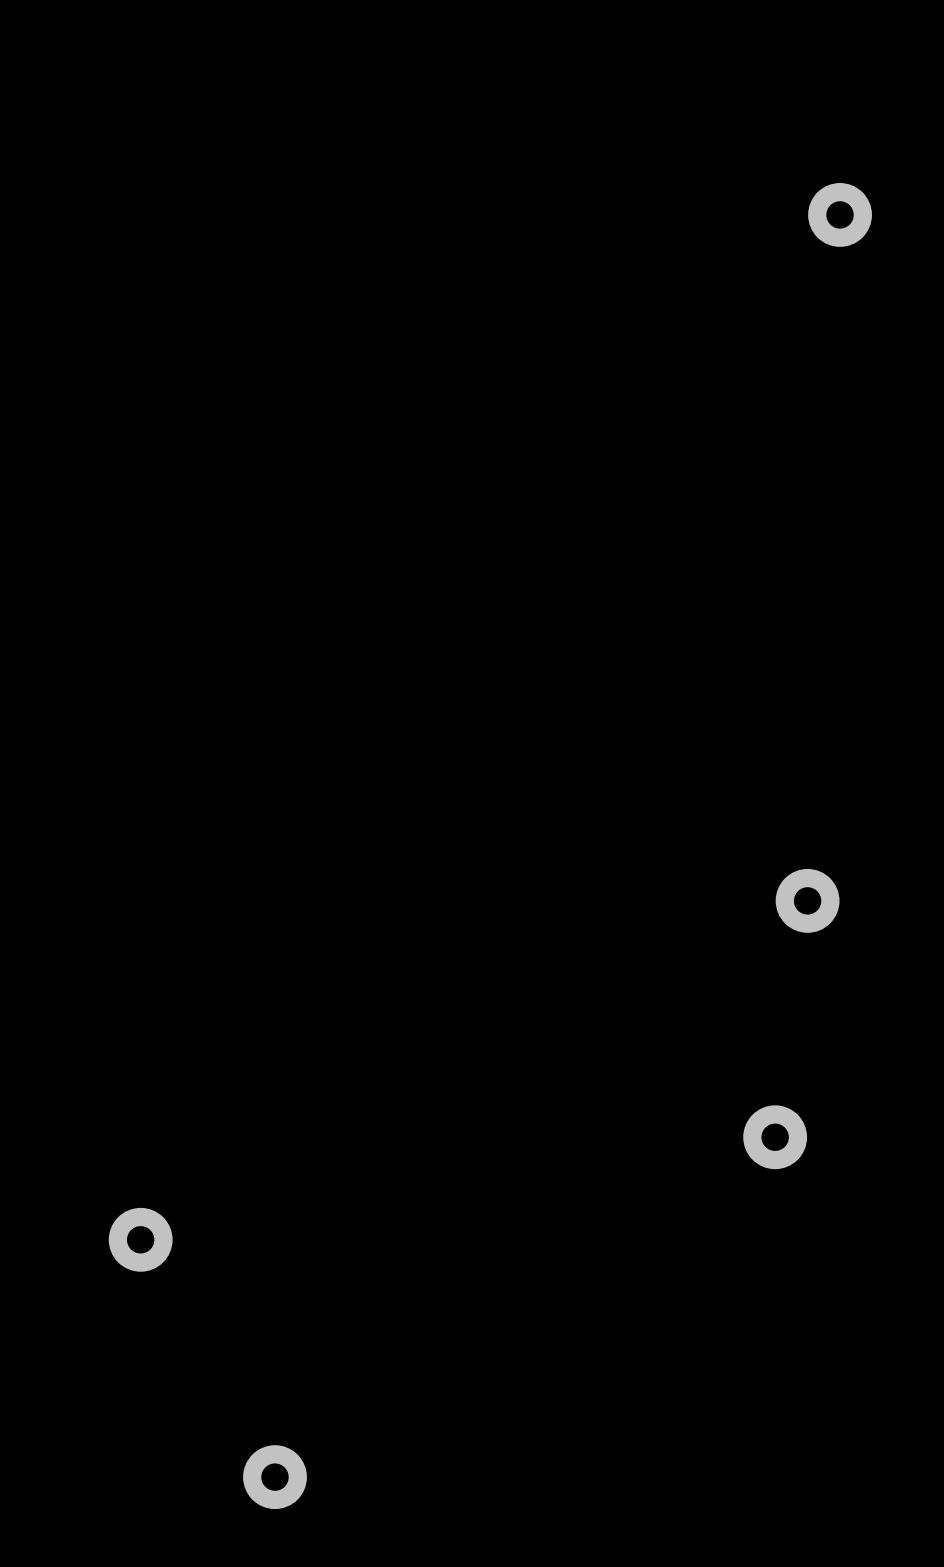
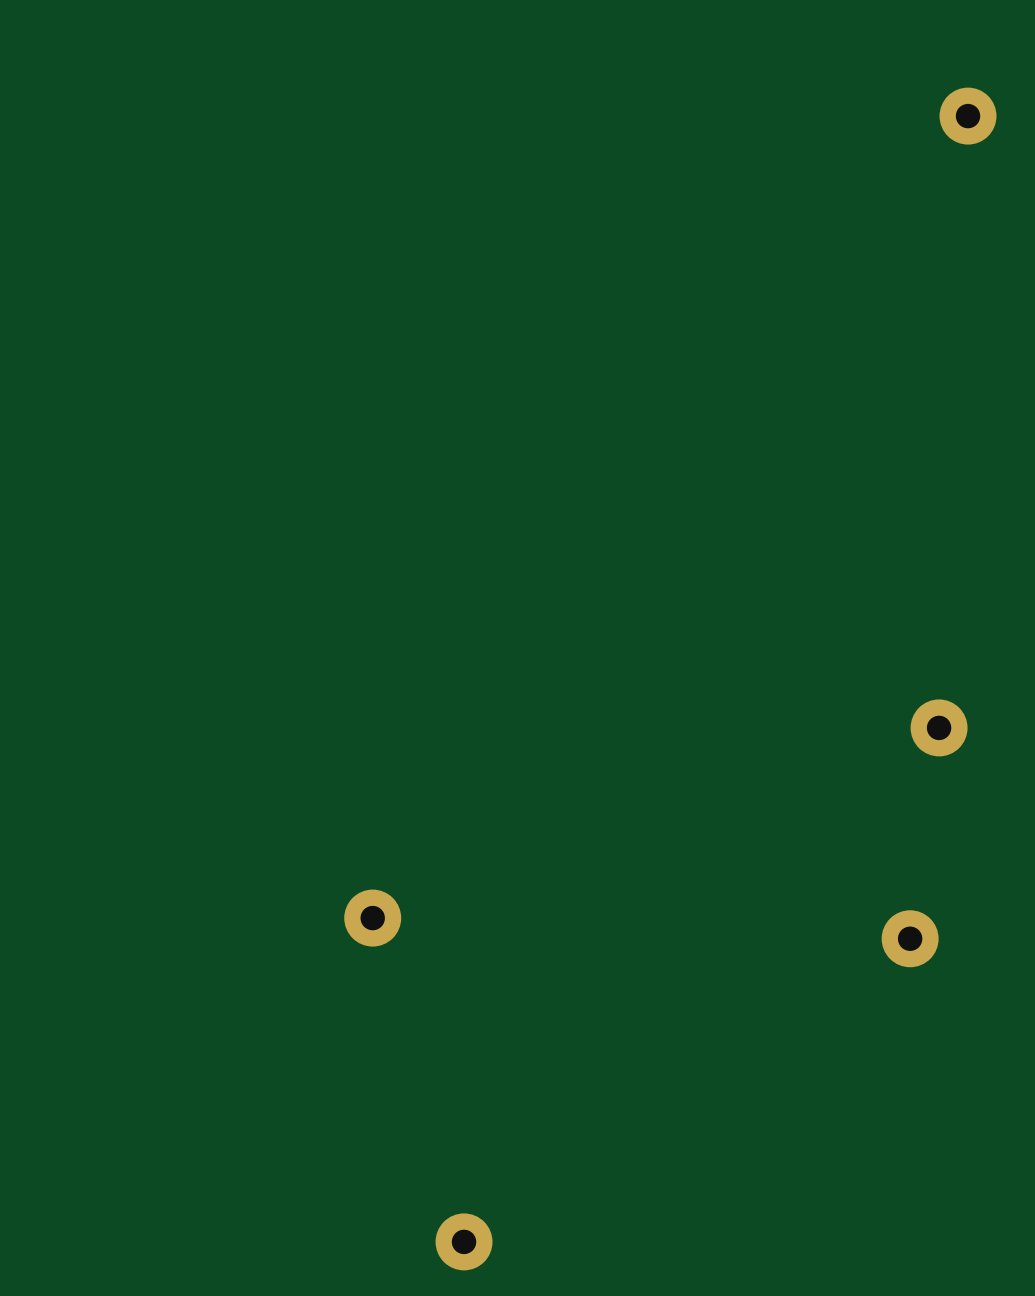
via position: (140, 1239) -> (372, 918)

